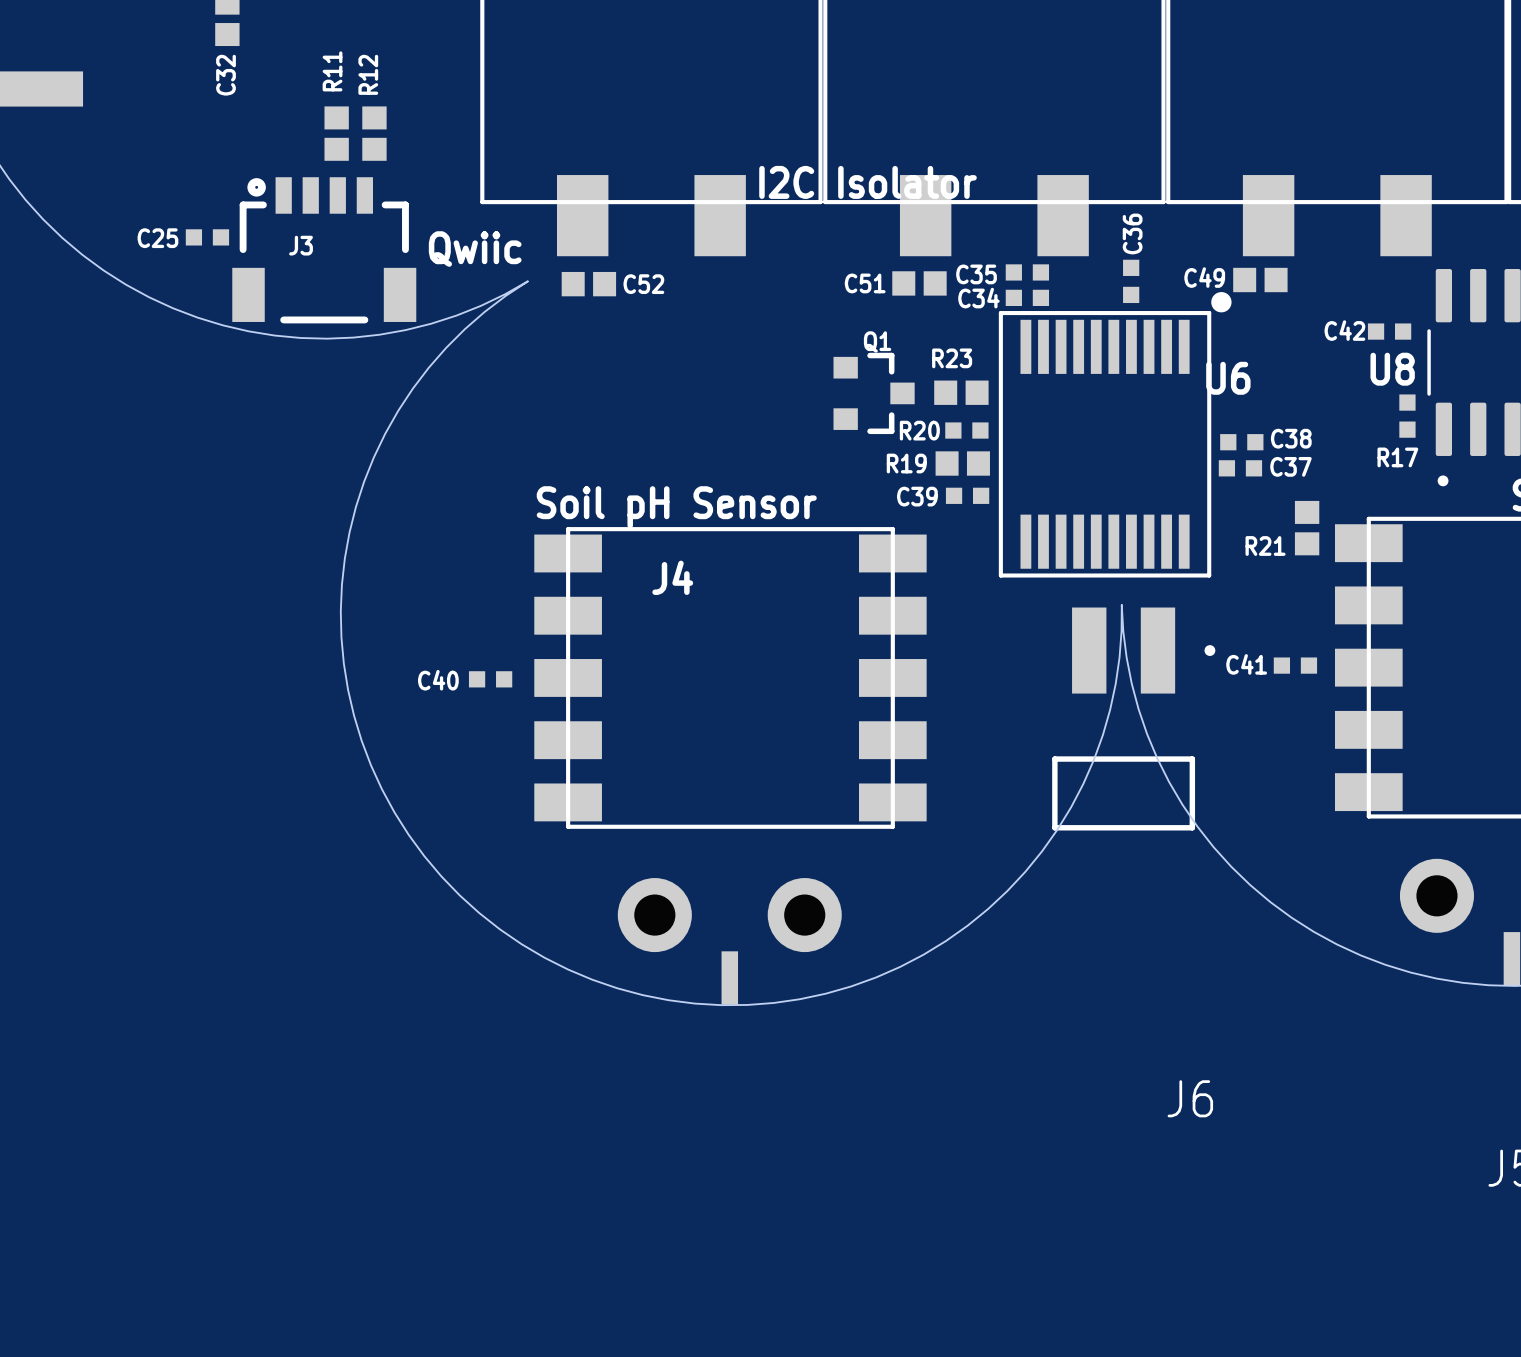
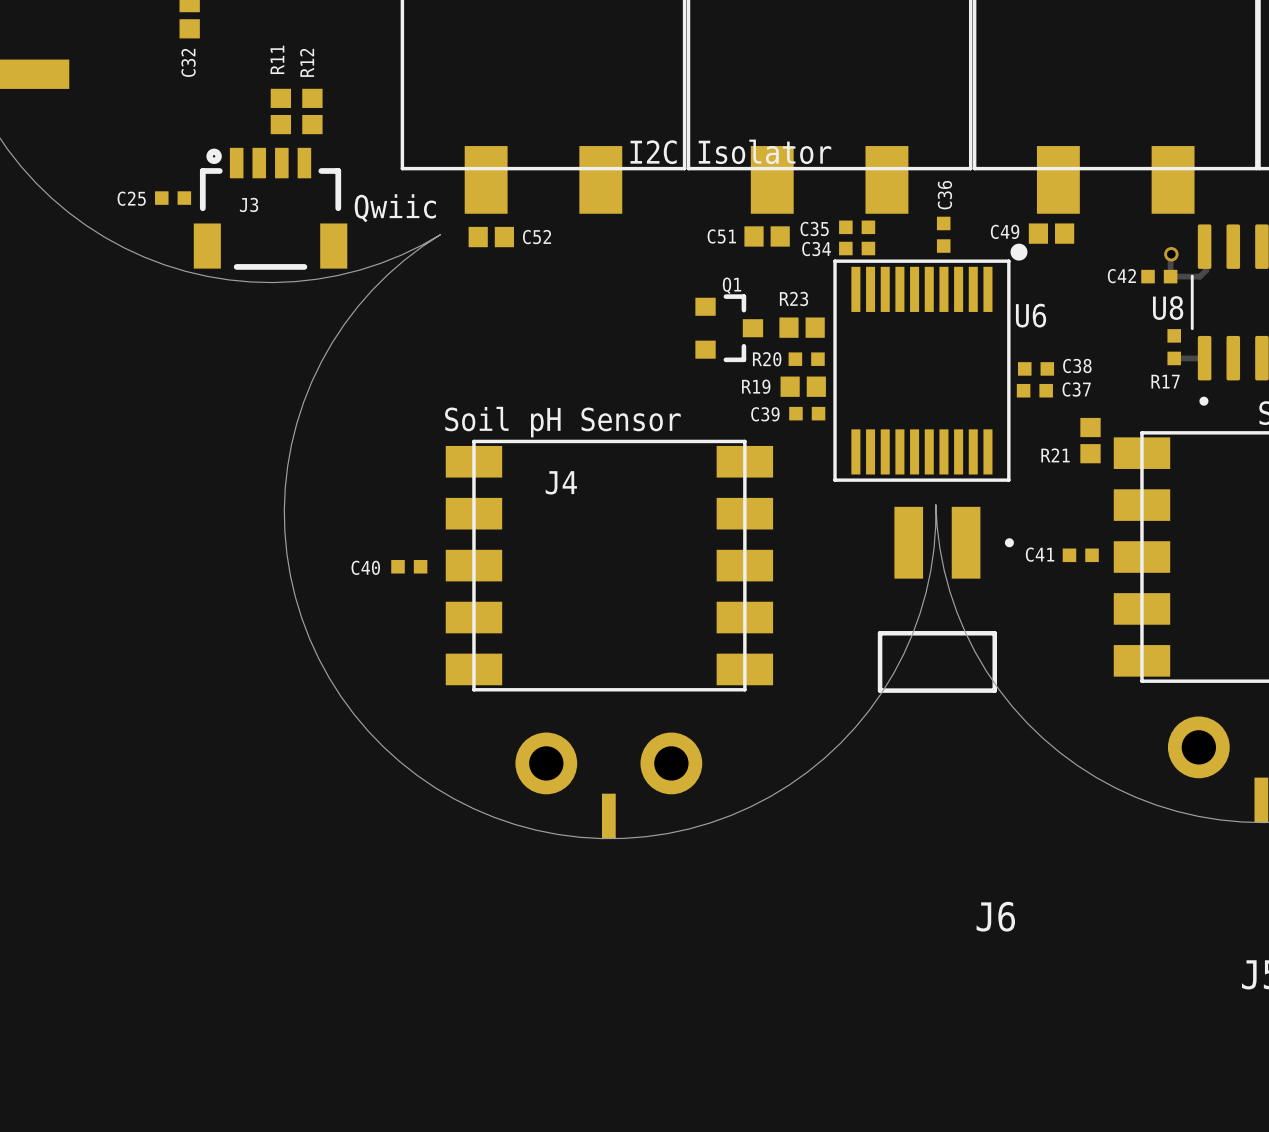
track: none -> (1204, 246) (1206, 248) (1206, 270) (1200, 276) (1170, 276) (1171, 254)
via: none -> (1171, 254)
track: none -> (1174, 358) (1204, 358)

